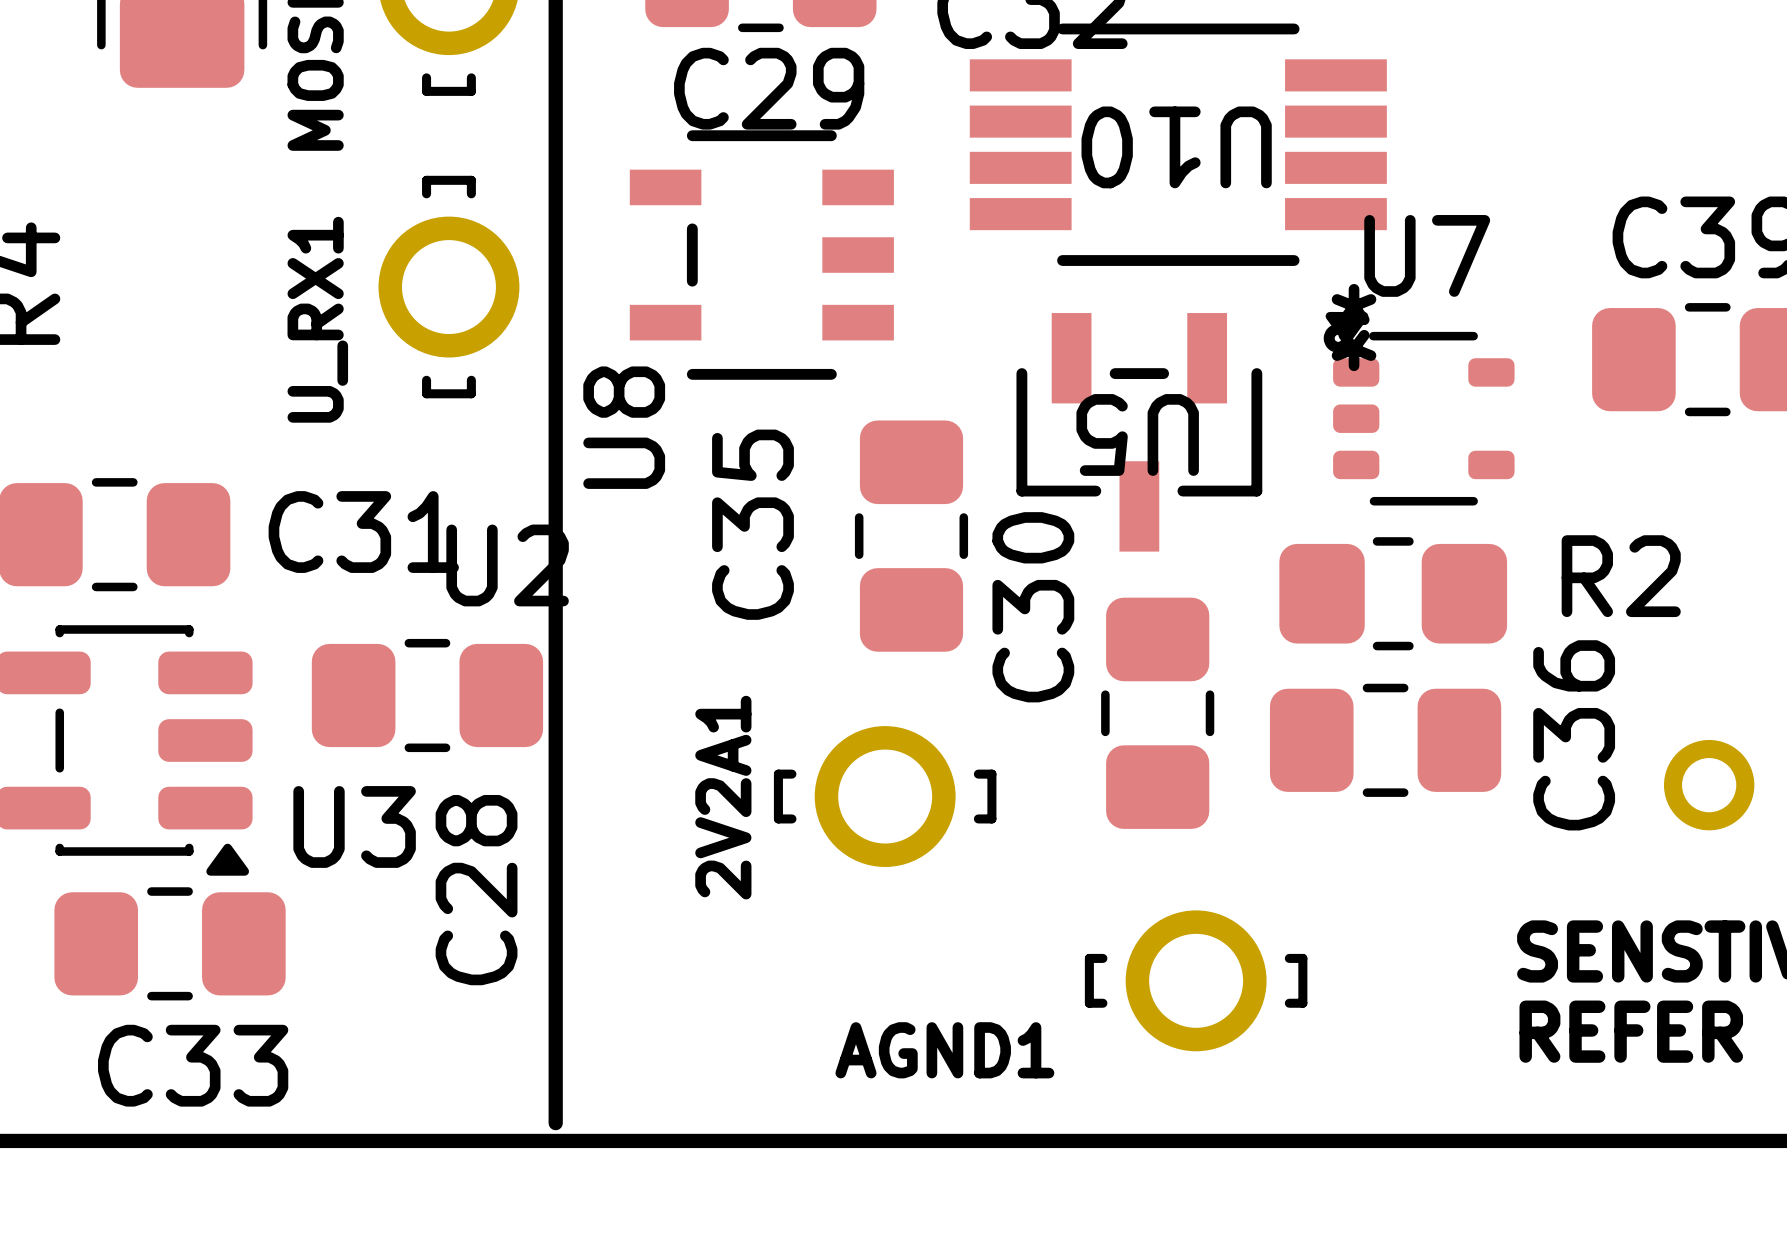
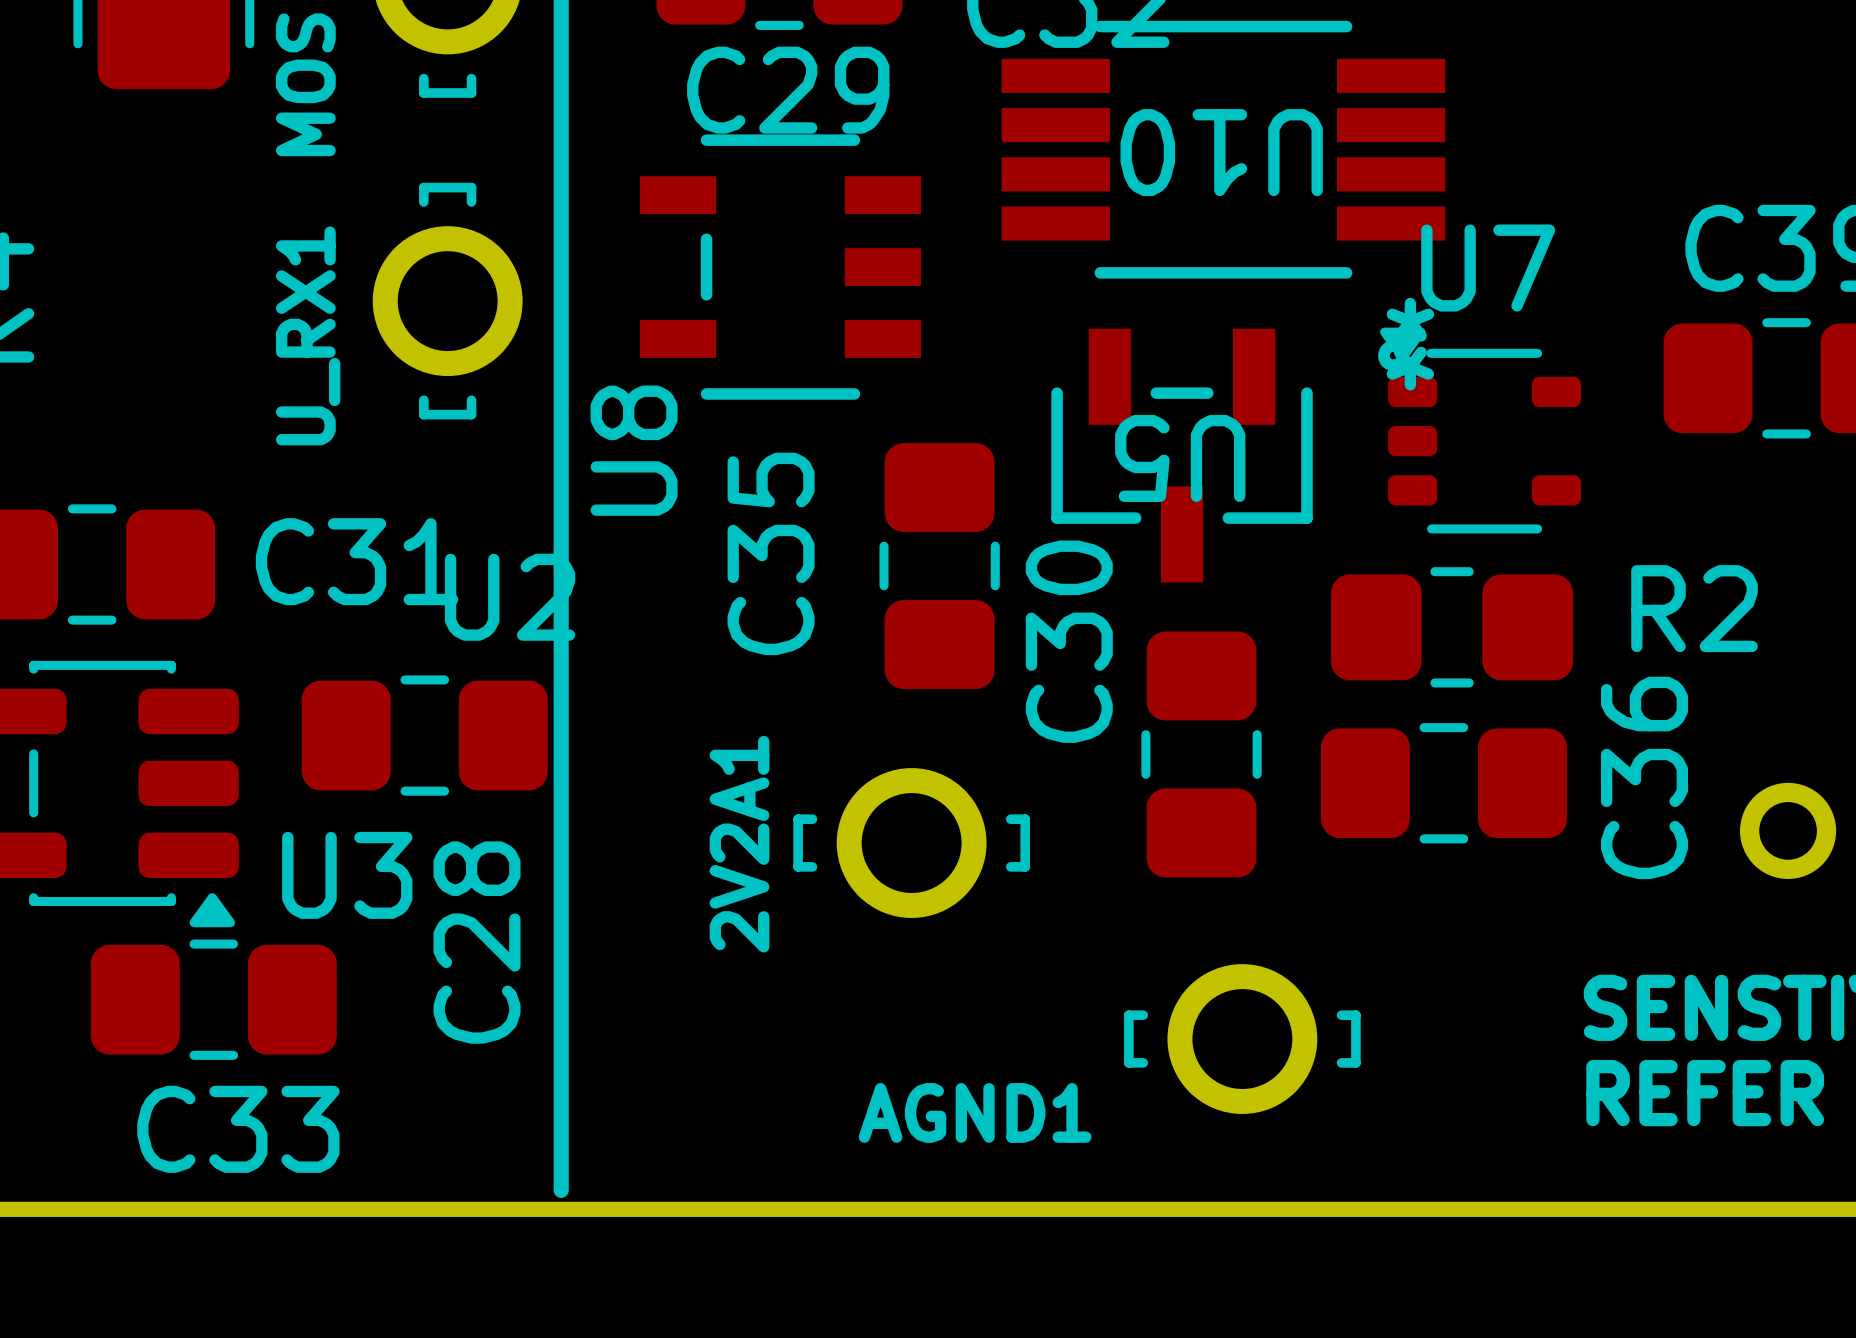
C33 position: (170, 943) -> (213, 999)

